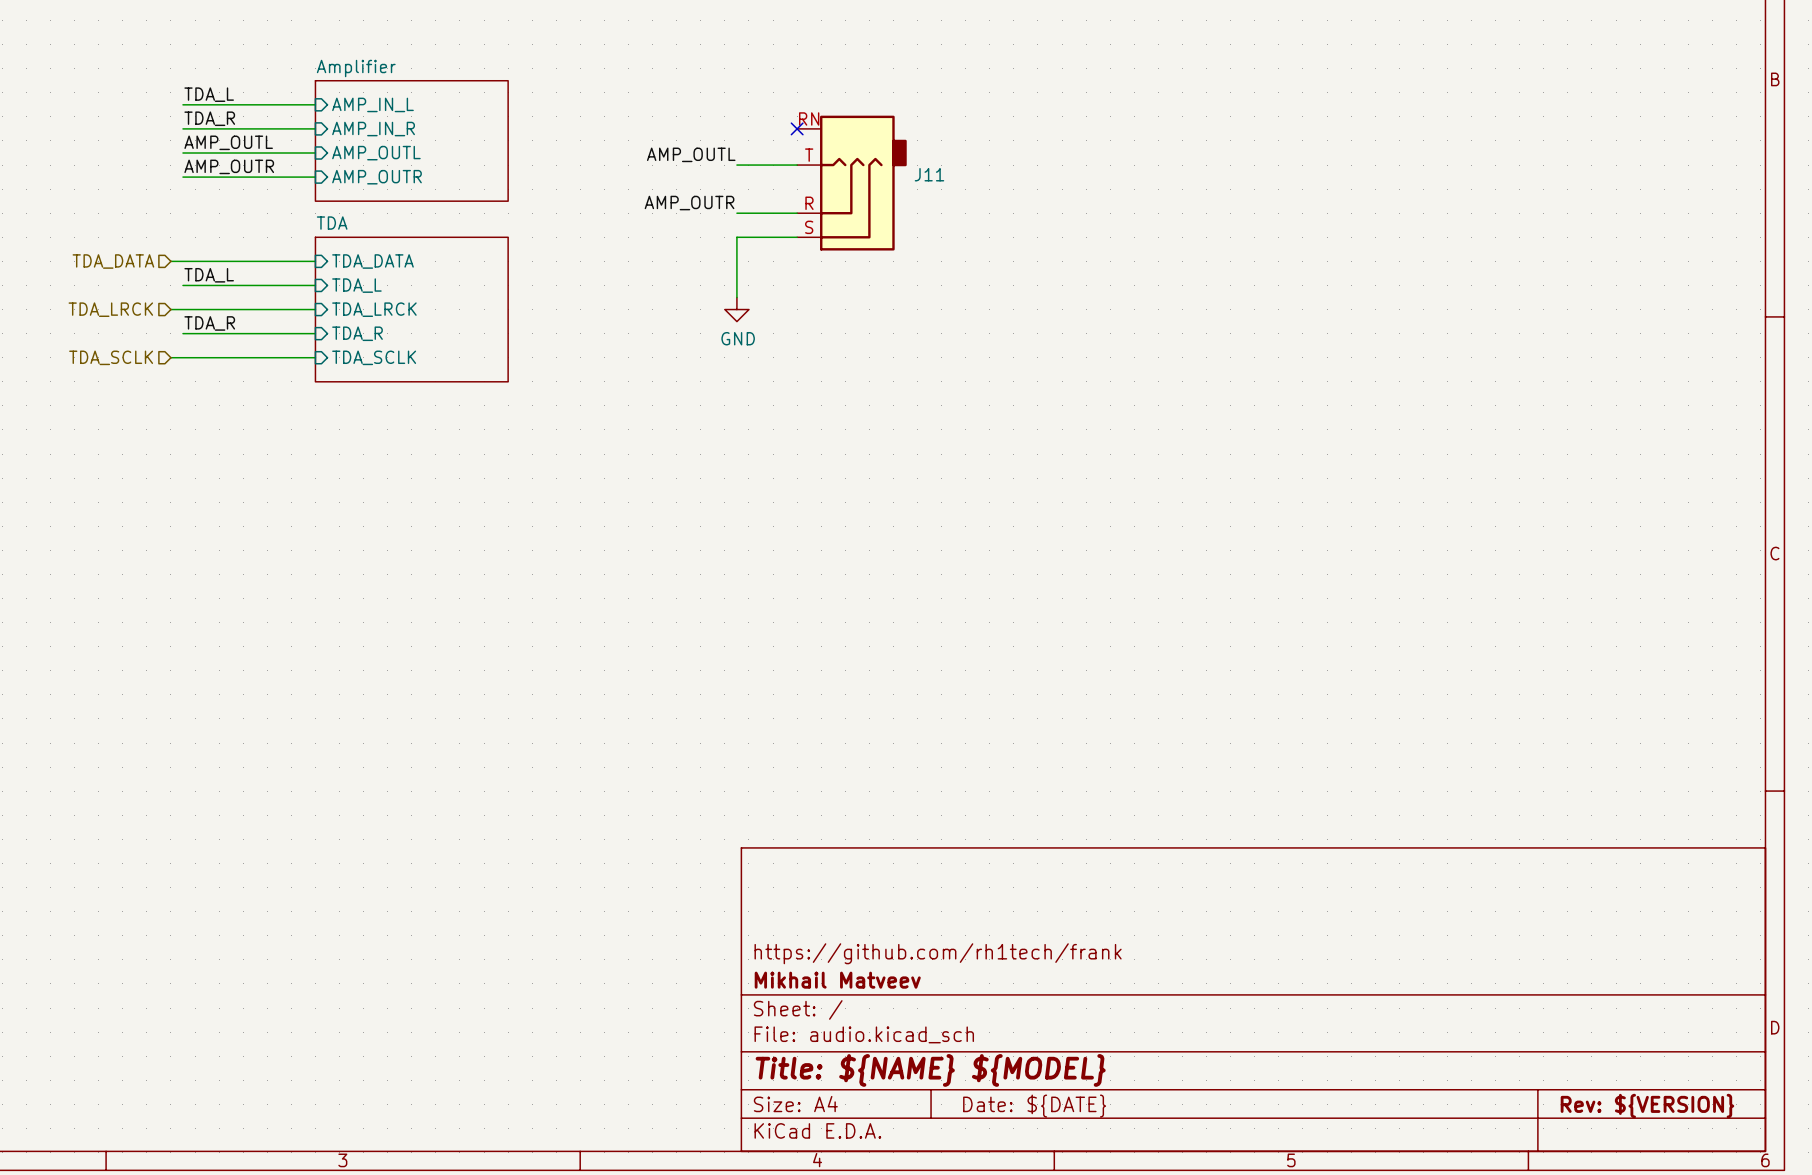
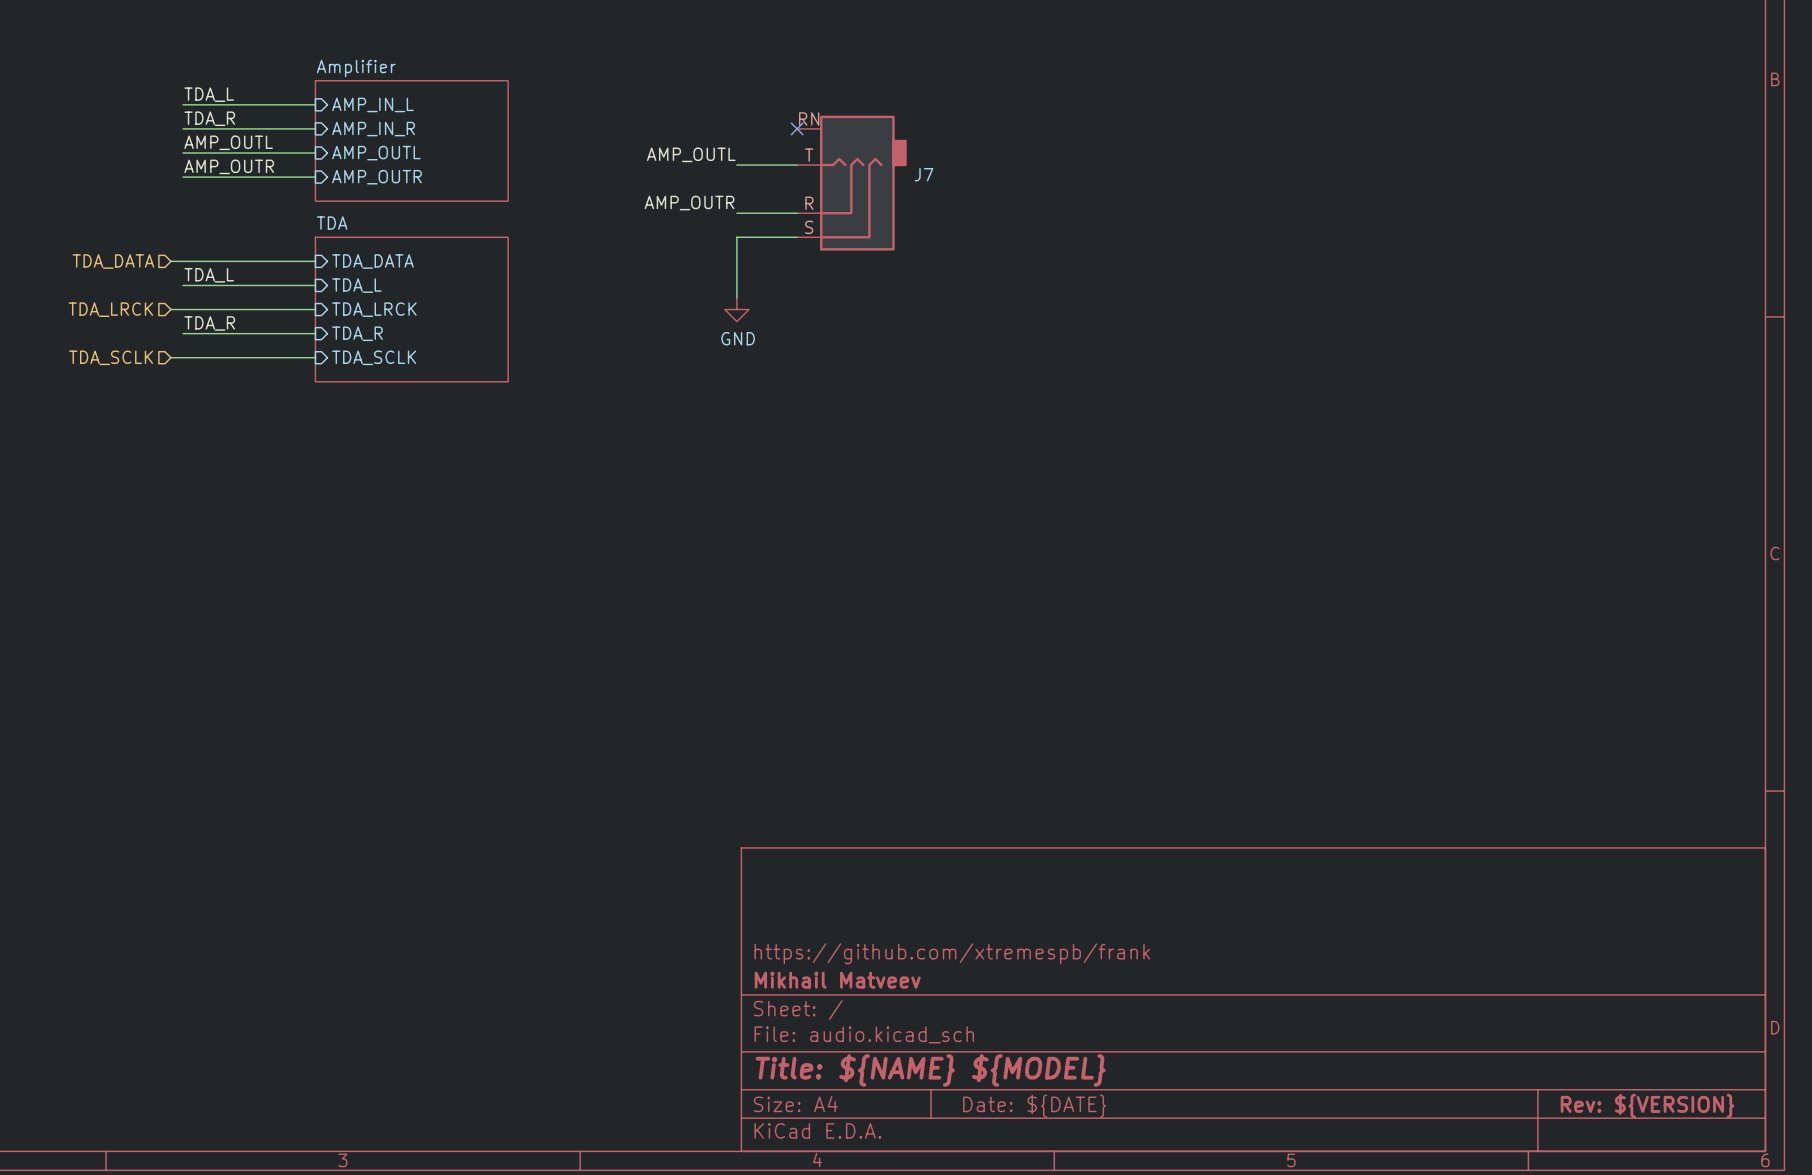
J11 name: J11 (929, 174) -> J7 (924, 174)
title block: https://github.com/rh1tech/frank (938, 953) -> https://github.com/xtremespb/frank (952, 953)

